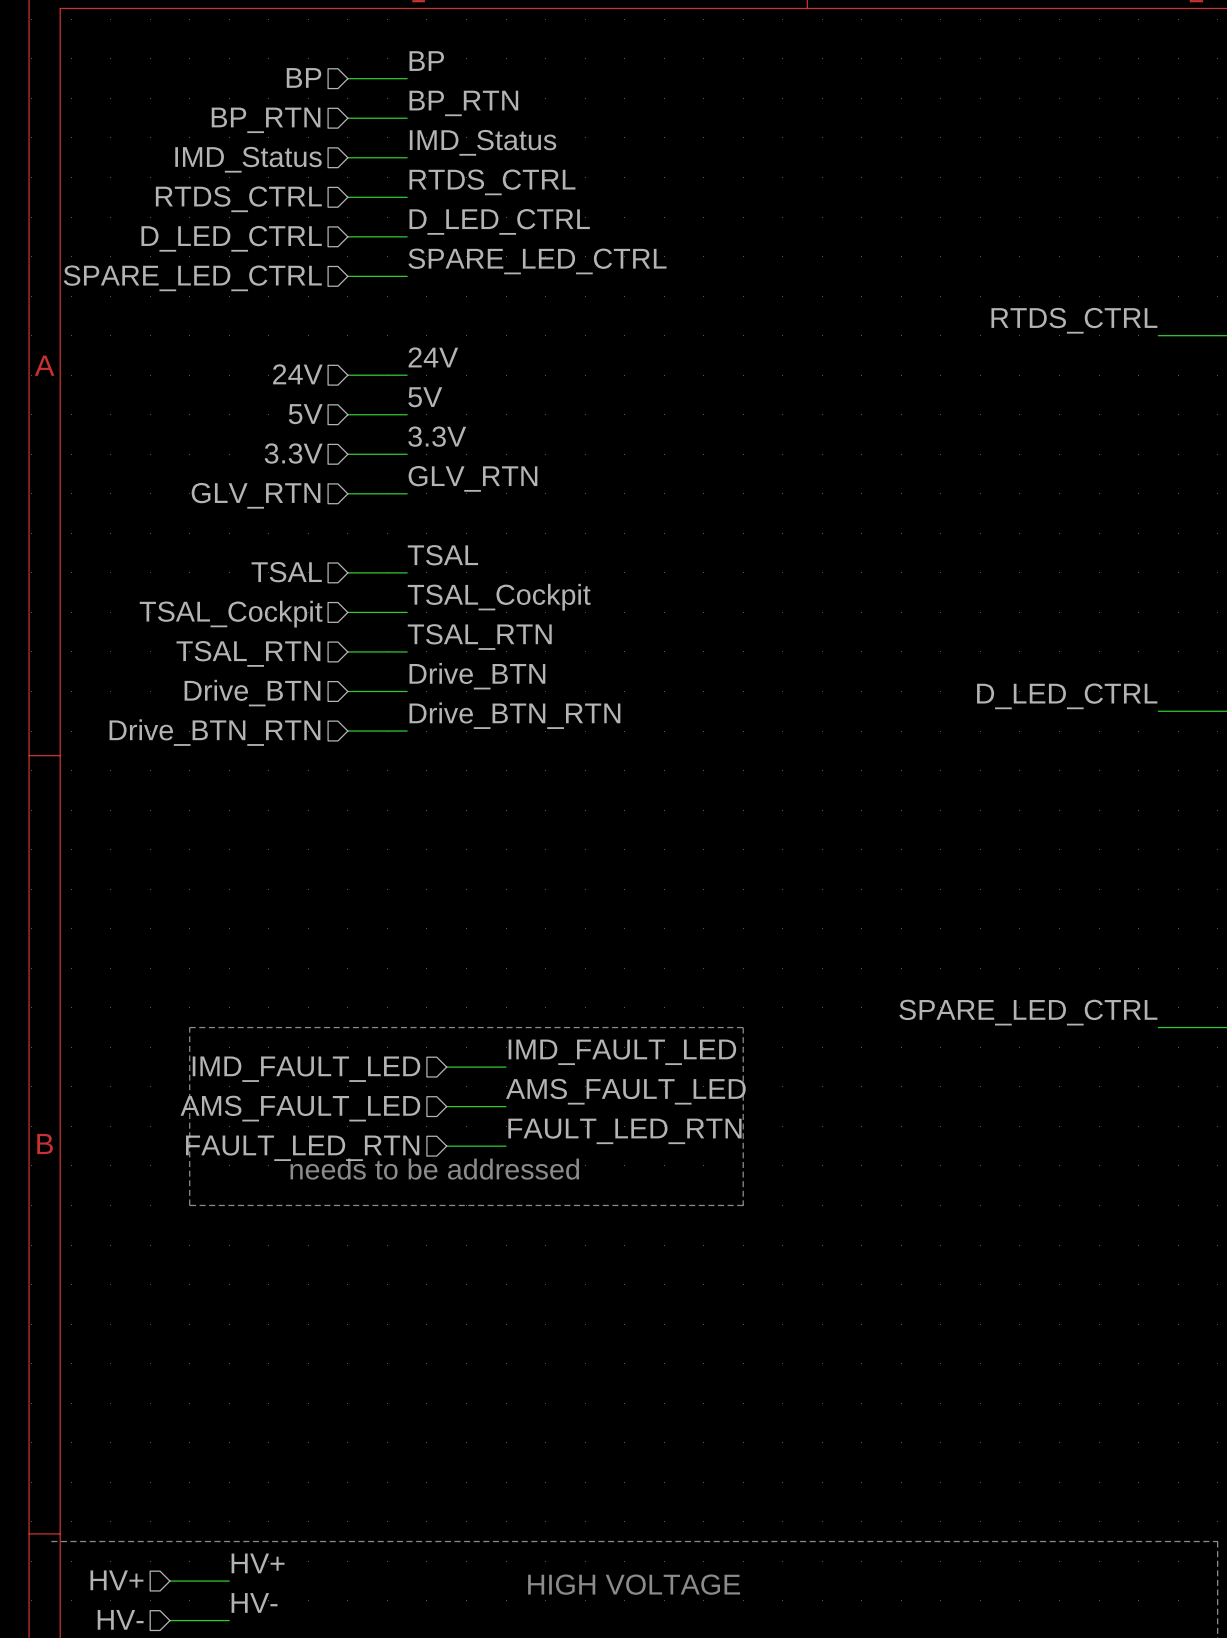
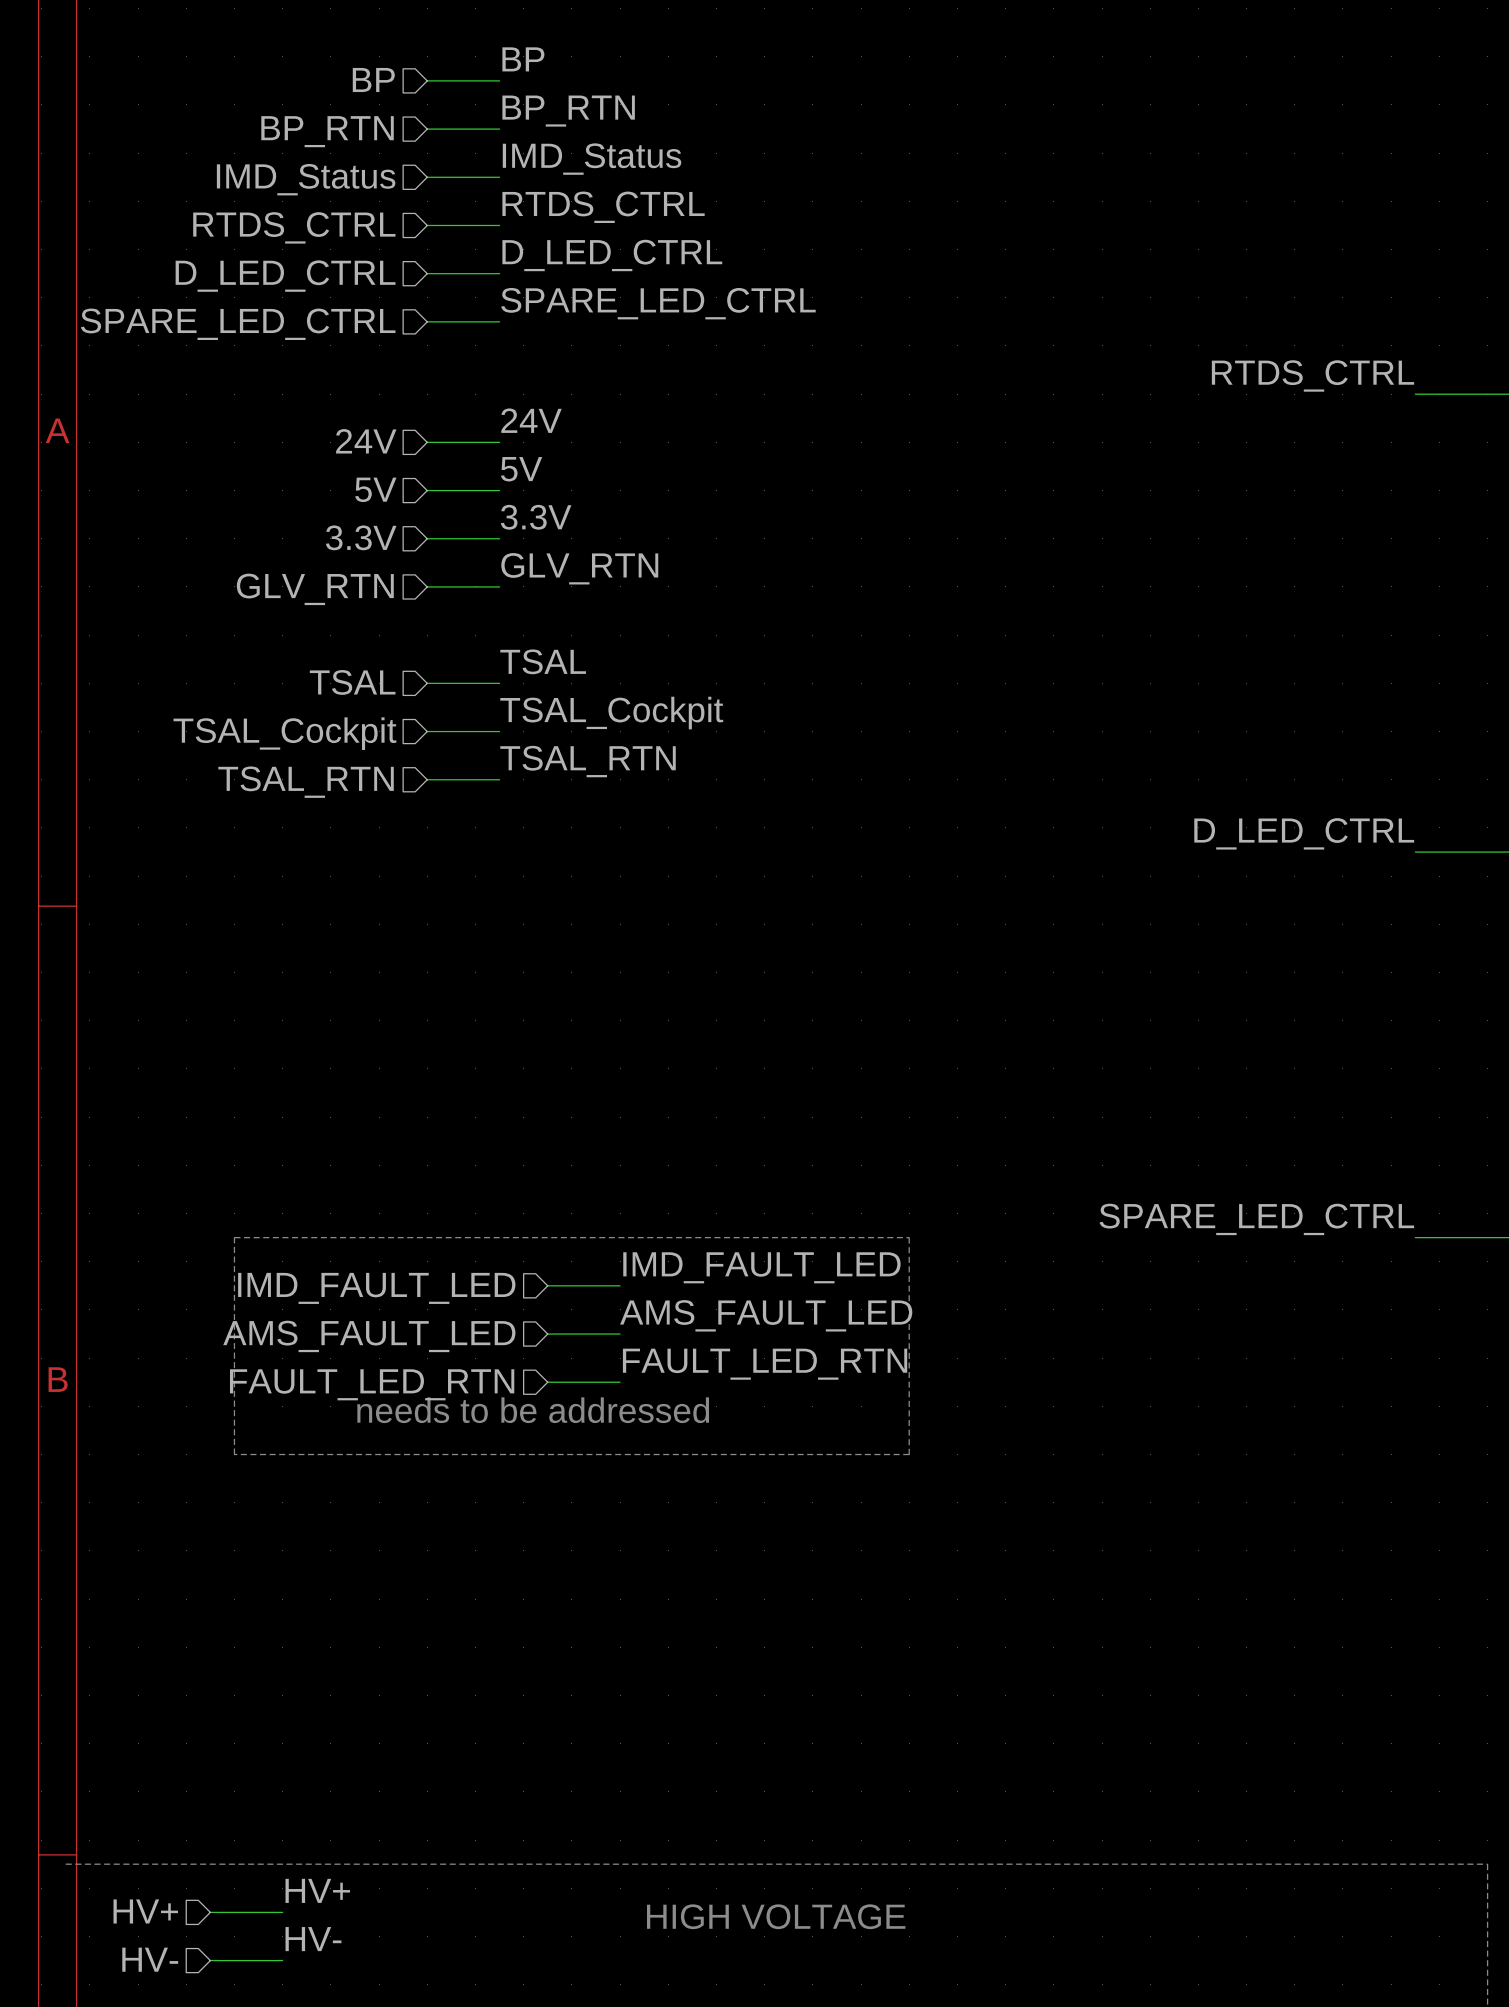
label: Drive_BTN (477, 676) -> none
wire: (347, 691) (407, 691) -> none
hierarchical label: Drive_BTN (252, 693) -> none
label: Drive_BTN_RTN (514, 715) -> none
wire: (347, 731) (407, 731) -> none
hierarchical label: Drive_BTN_RTN (214, 732) -> none

